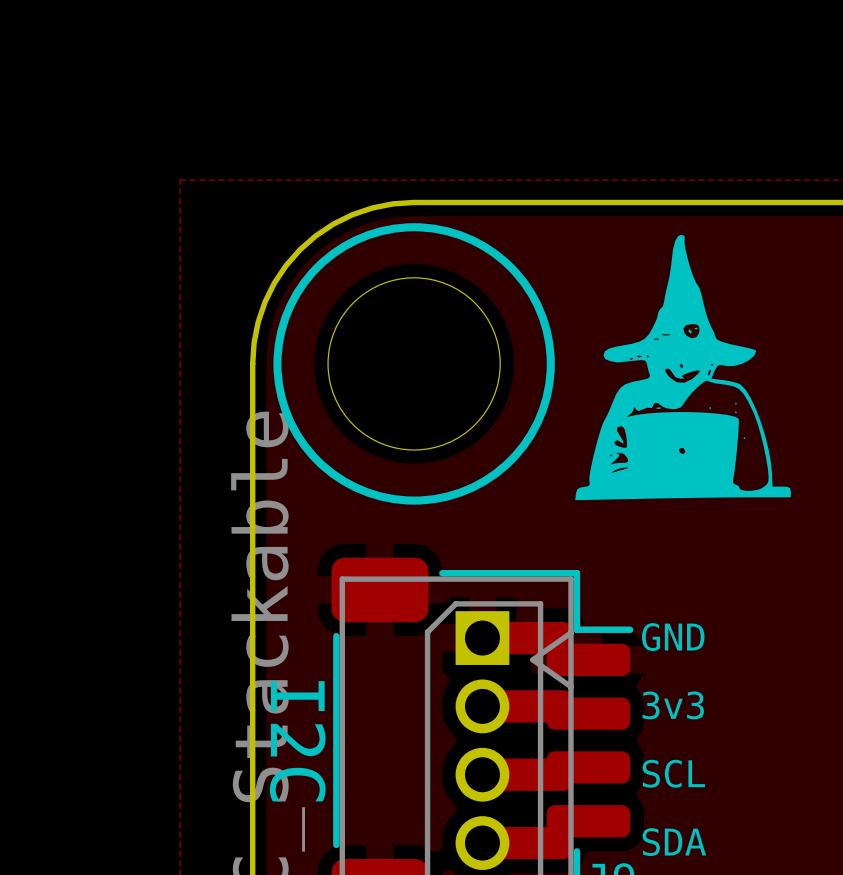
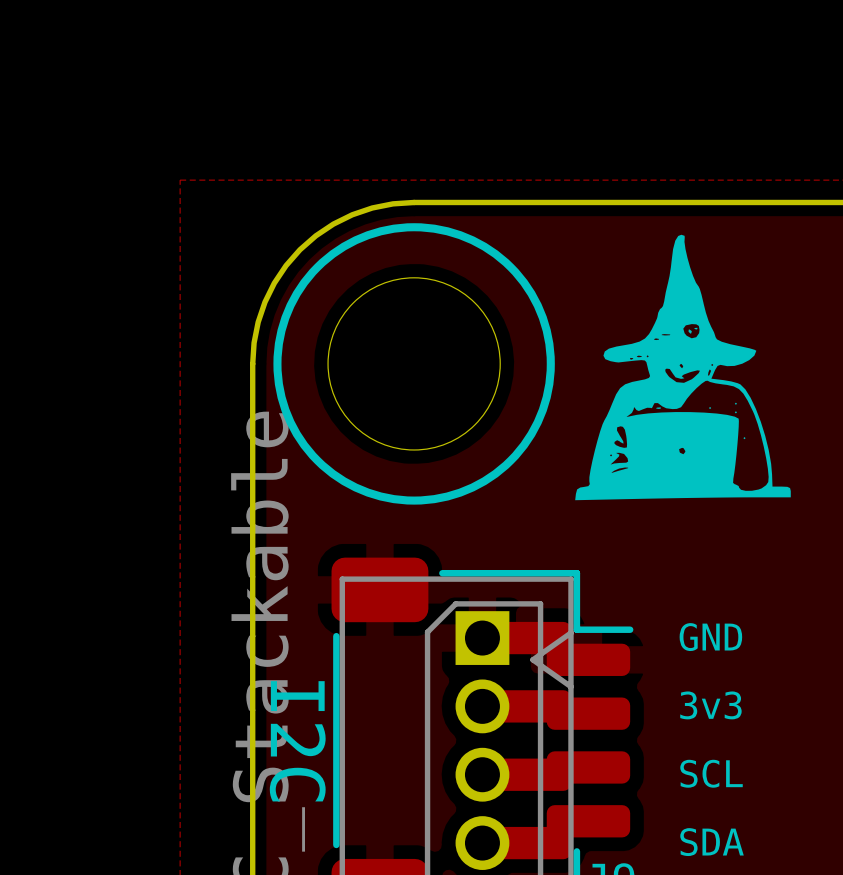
text position: GND (673, 637) -> GND (710, 637)
text position: 3v3 (673, 705) -> 3v3 (710, 705)
text position: SCL (673, 773) -> SCL (711, 773)
text position: SDA (674, 842) -> SDA (712, 842)

